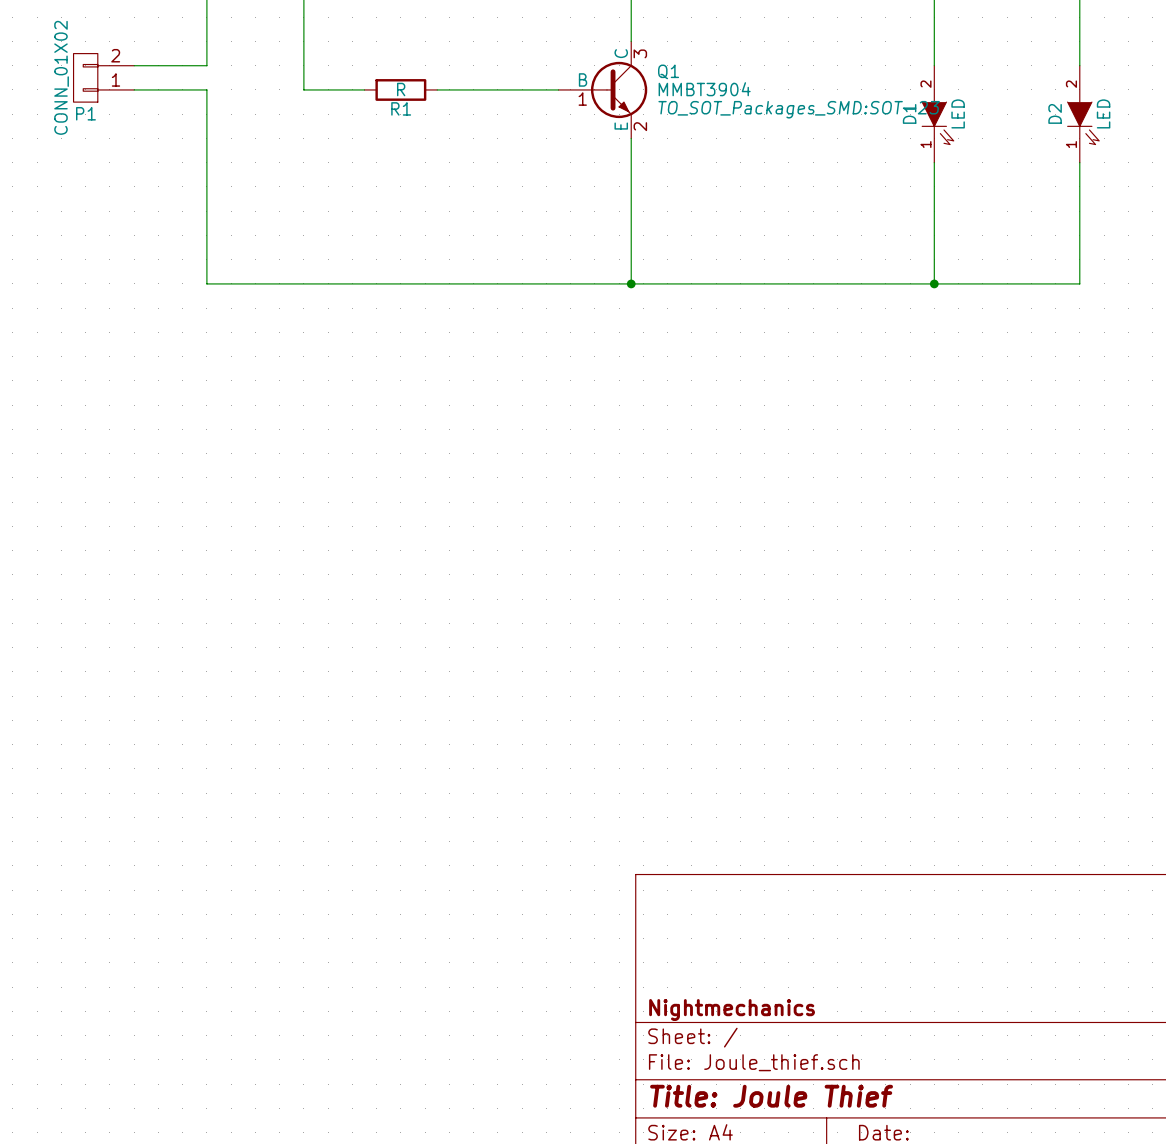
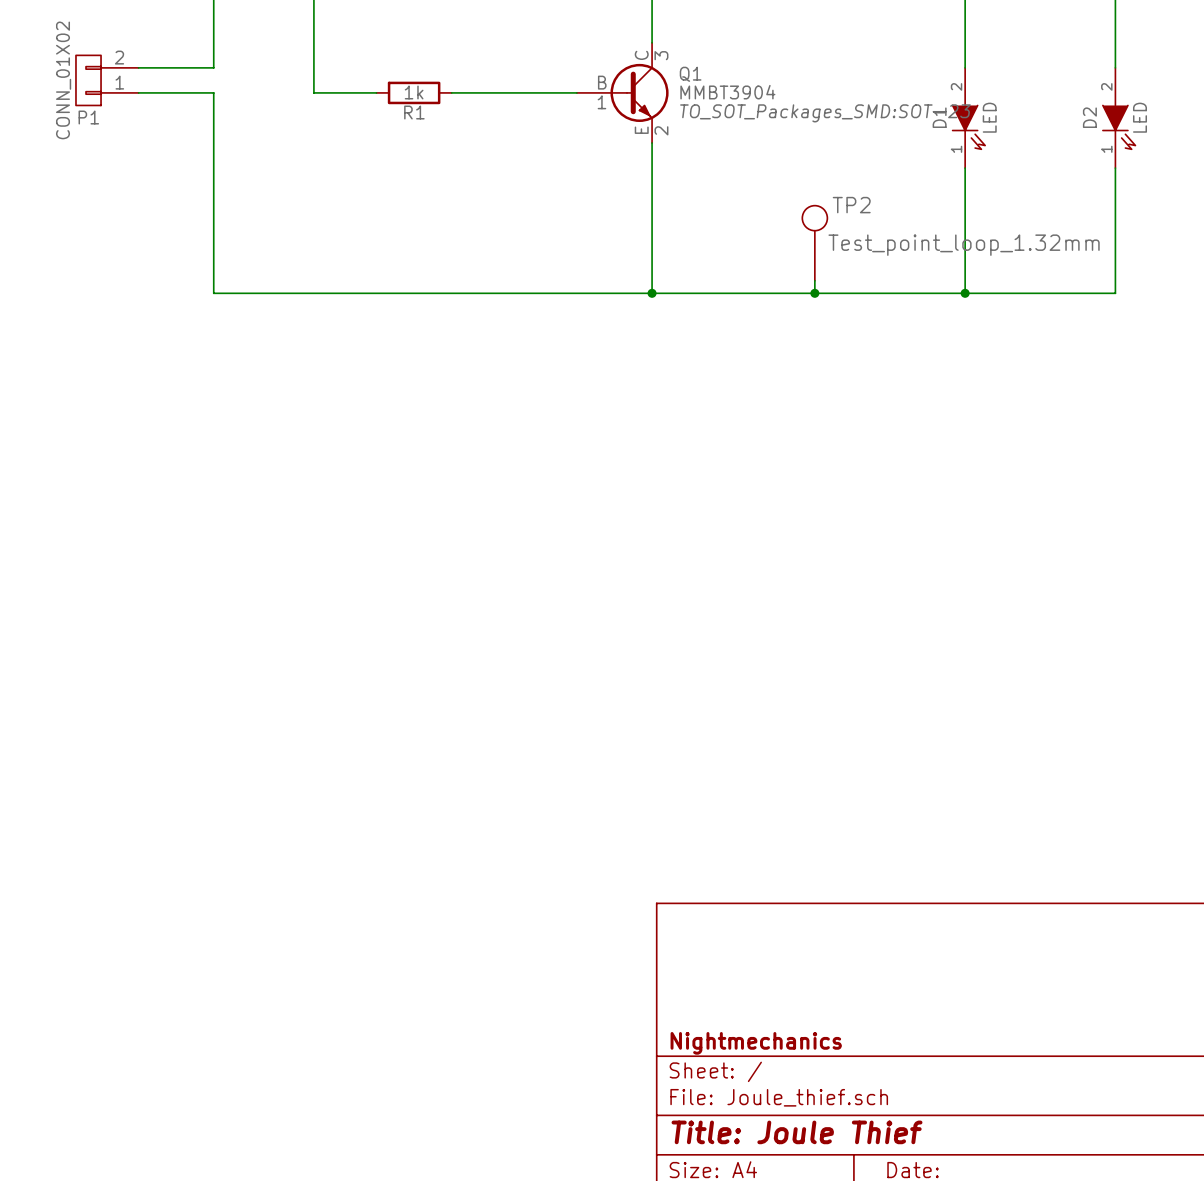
R1 value: R (401, 89) -> 1k (414, 92)
TP2: none -> Test_point_loop_1.32mm (814, 243)
wire: none -> (814, 280) (814, 293)
junction: none -> (814, 293)

